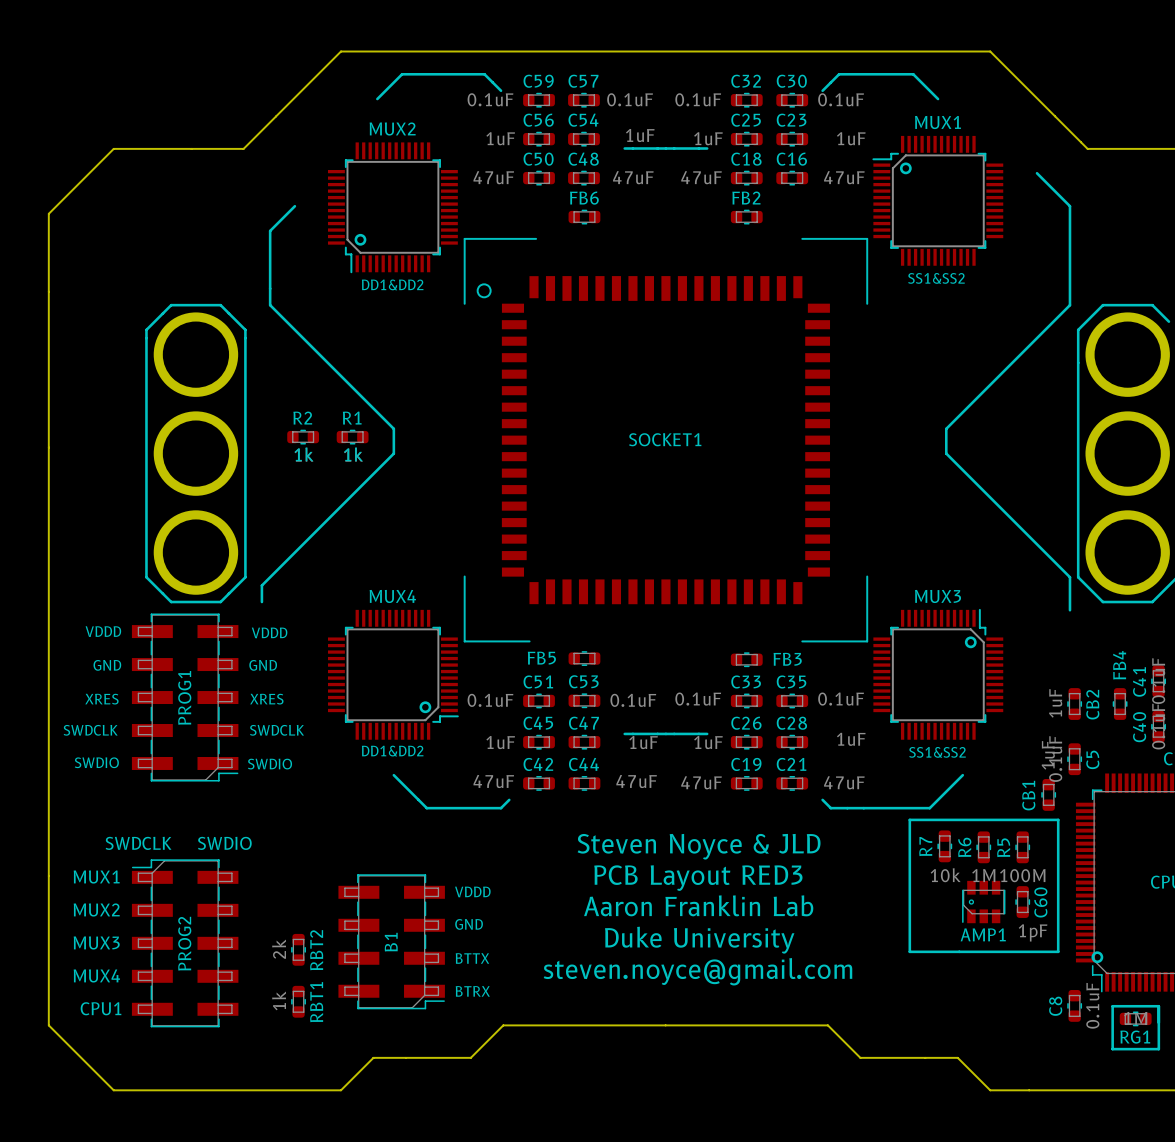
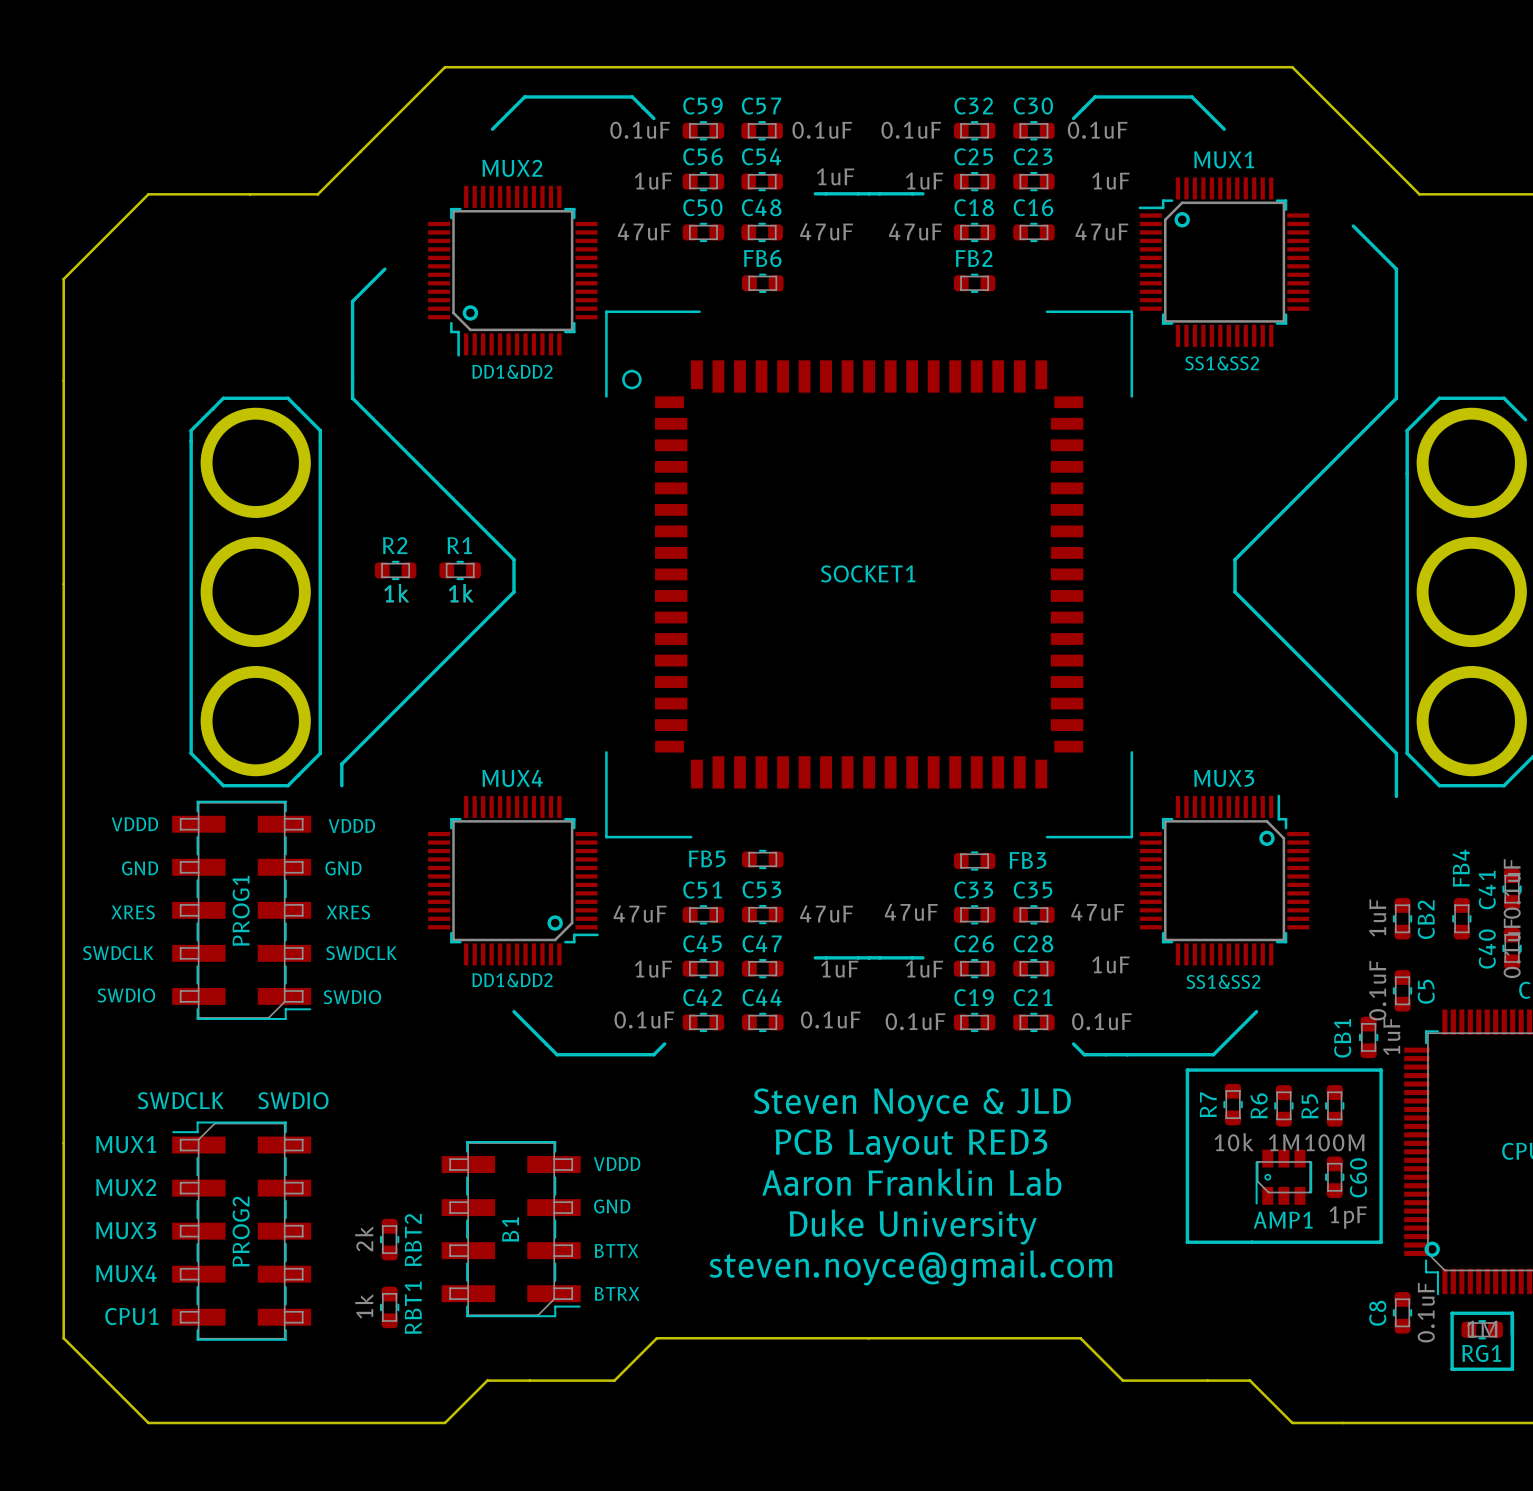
C33 value: 0.1uF (698, 699) -> 47uF (911, 912)
C35 value: 0.1uF (841, 699) -> 47uF (1097, 912)
C51 value: 0.1uF (490, 700) -> 47uF (640, 914)
C53 value: 0.1uF (633, 700) -> 47uF (826, 914)
CB1 value position: 1uF (1048, 755) -> 1uF (1391, 1036)
C42 value: 47uF (493, 781) -> 0.1uF (644, 1019)
C44 value: 47uF (636, 781) -> 0.1uF (830, 1019)
C19 value: 47uF (701, 782) -> 0.1uF (915, 1021)
C21 value: 47uF (844, 782) -> 0.1uF (1101, 1021)

